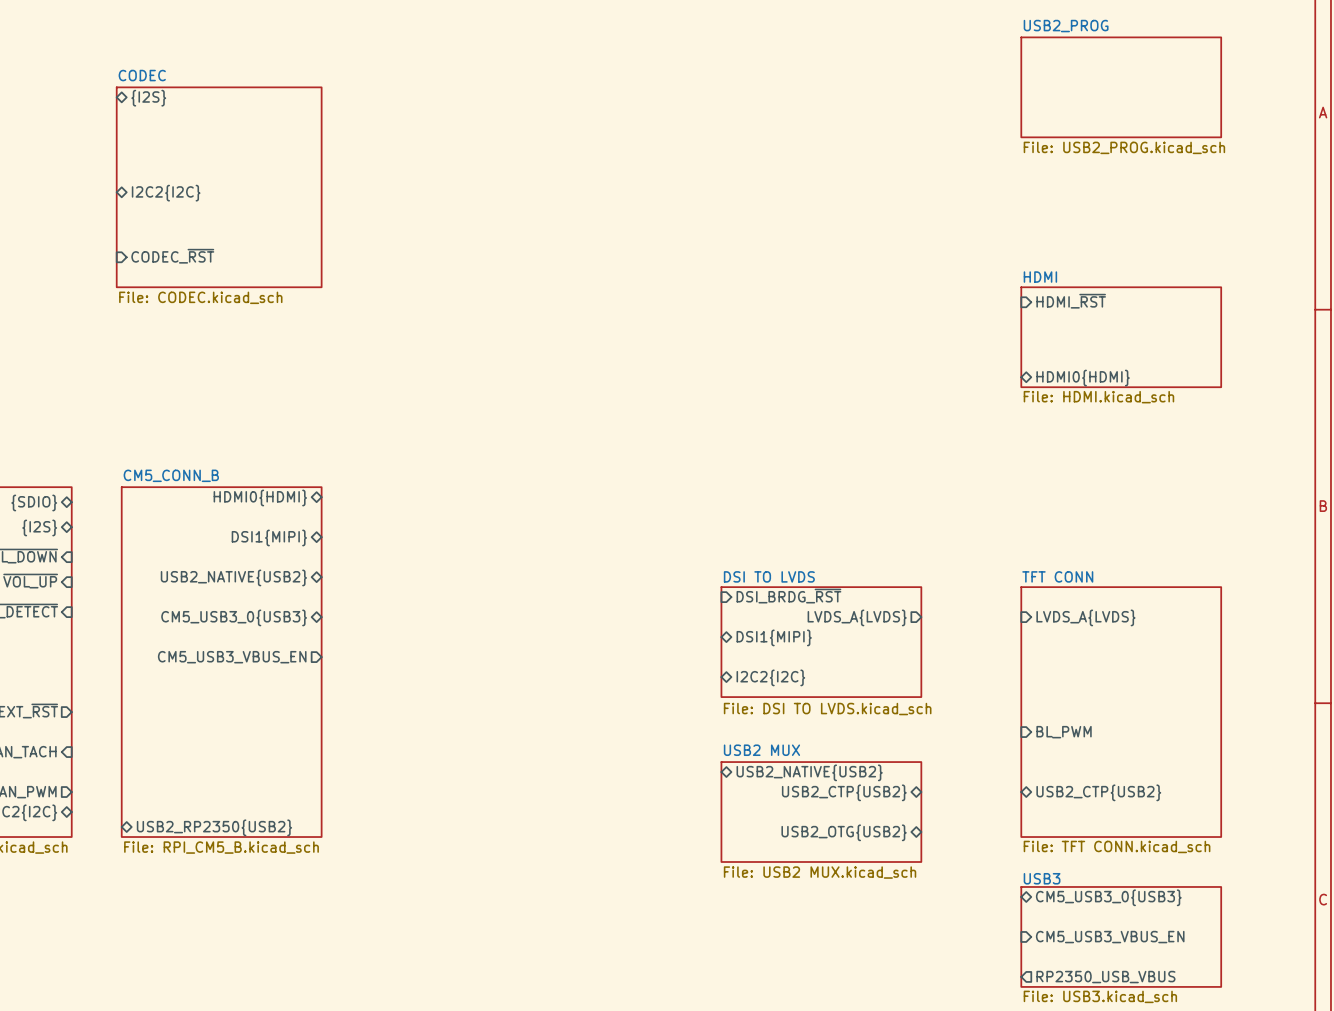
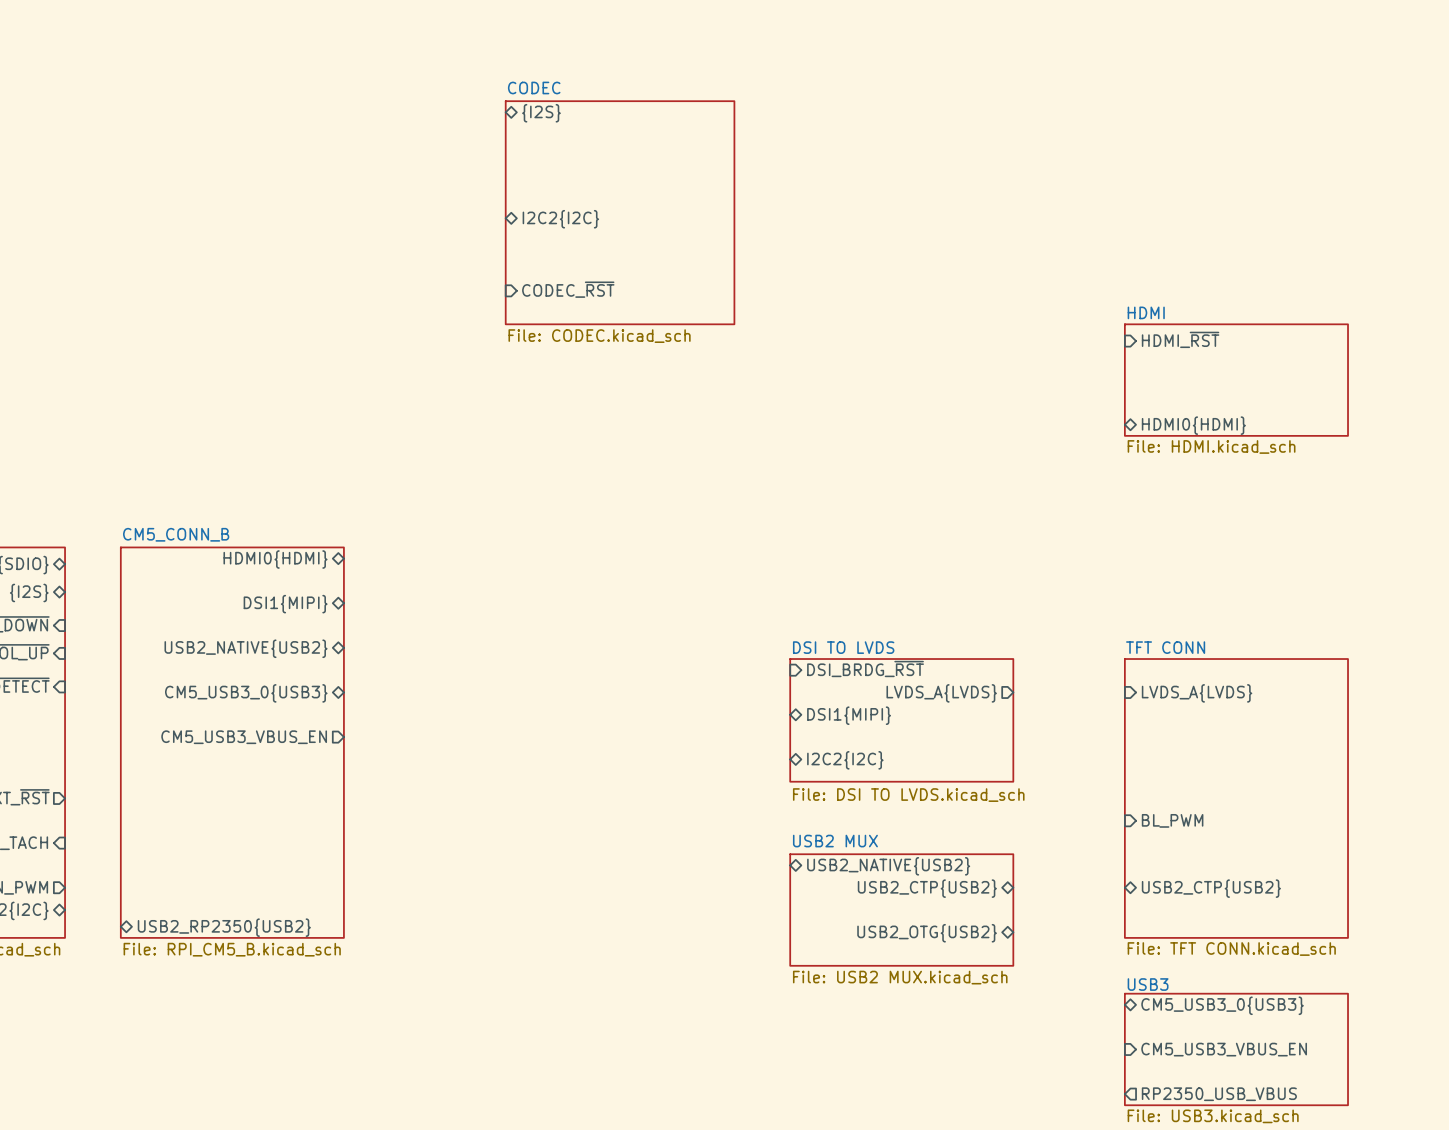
sheet USB2_PROG: File: USB2_PROG.kicad_sch (1121, 87) -> none
sheet pin: {I2S} (148, 98) -> none
sheet pin: none -> {I2S} (541, 113)
sheet CODEC: File: CODEC.kicad_sch (219, 187) -> none
sheet CODEC: none -> File: CODEC.kicad_sch (620, 212)
sheet pin: I2C2{I2C} (166, 193) -> none
sheet pin: none -> I2C2{I2C} (560, 219)
sheet pin: CODEC_~{RST} (172, 256) -> none
sheet pin: none -> CODEC_~{RST} (568, 289)

